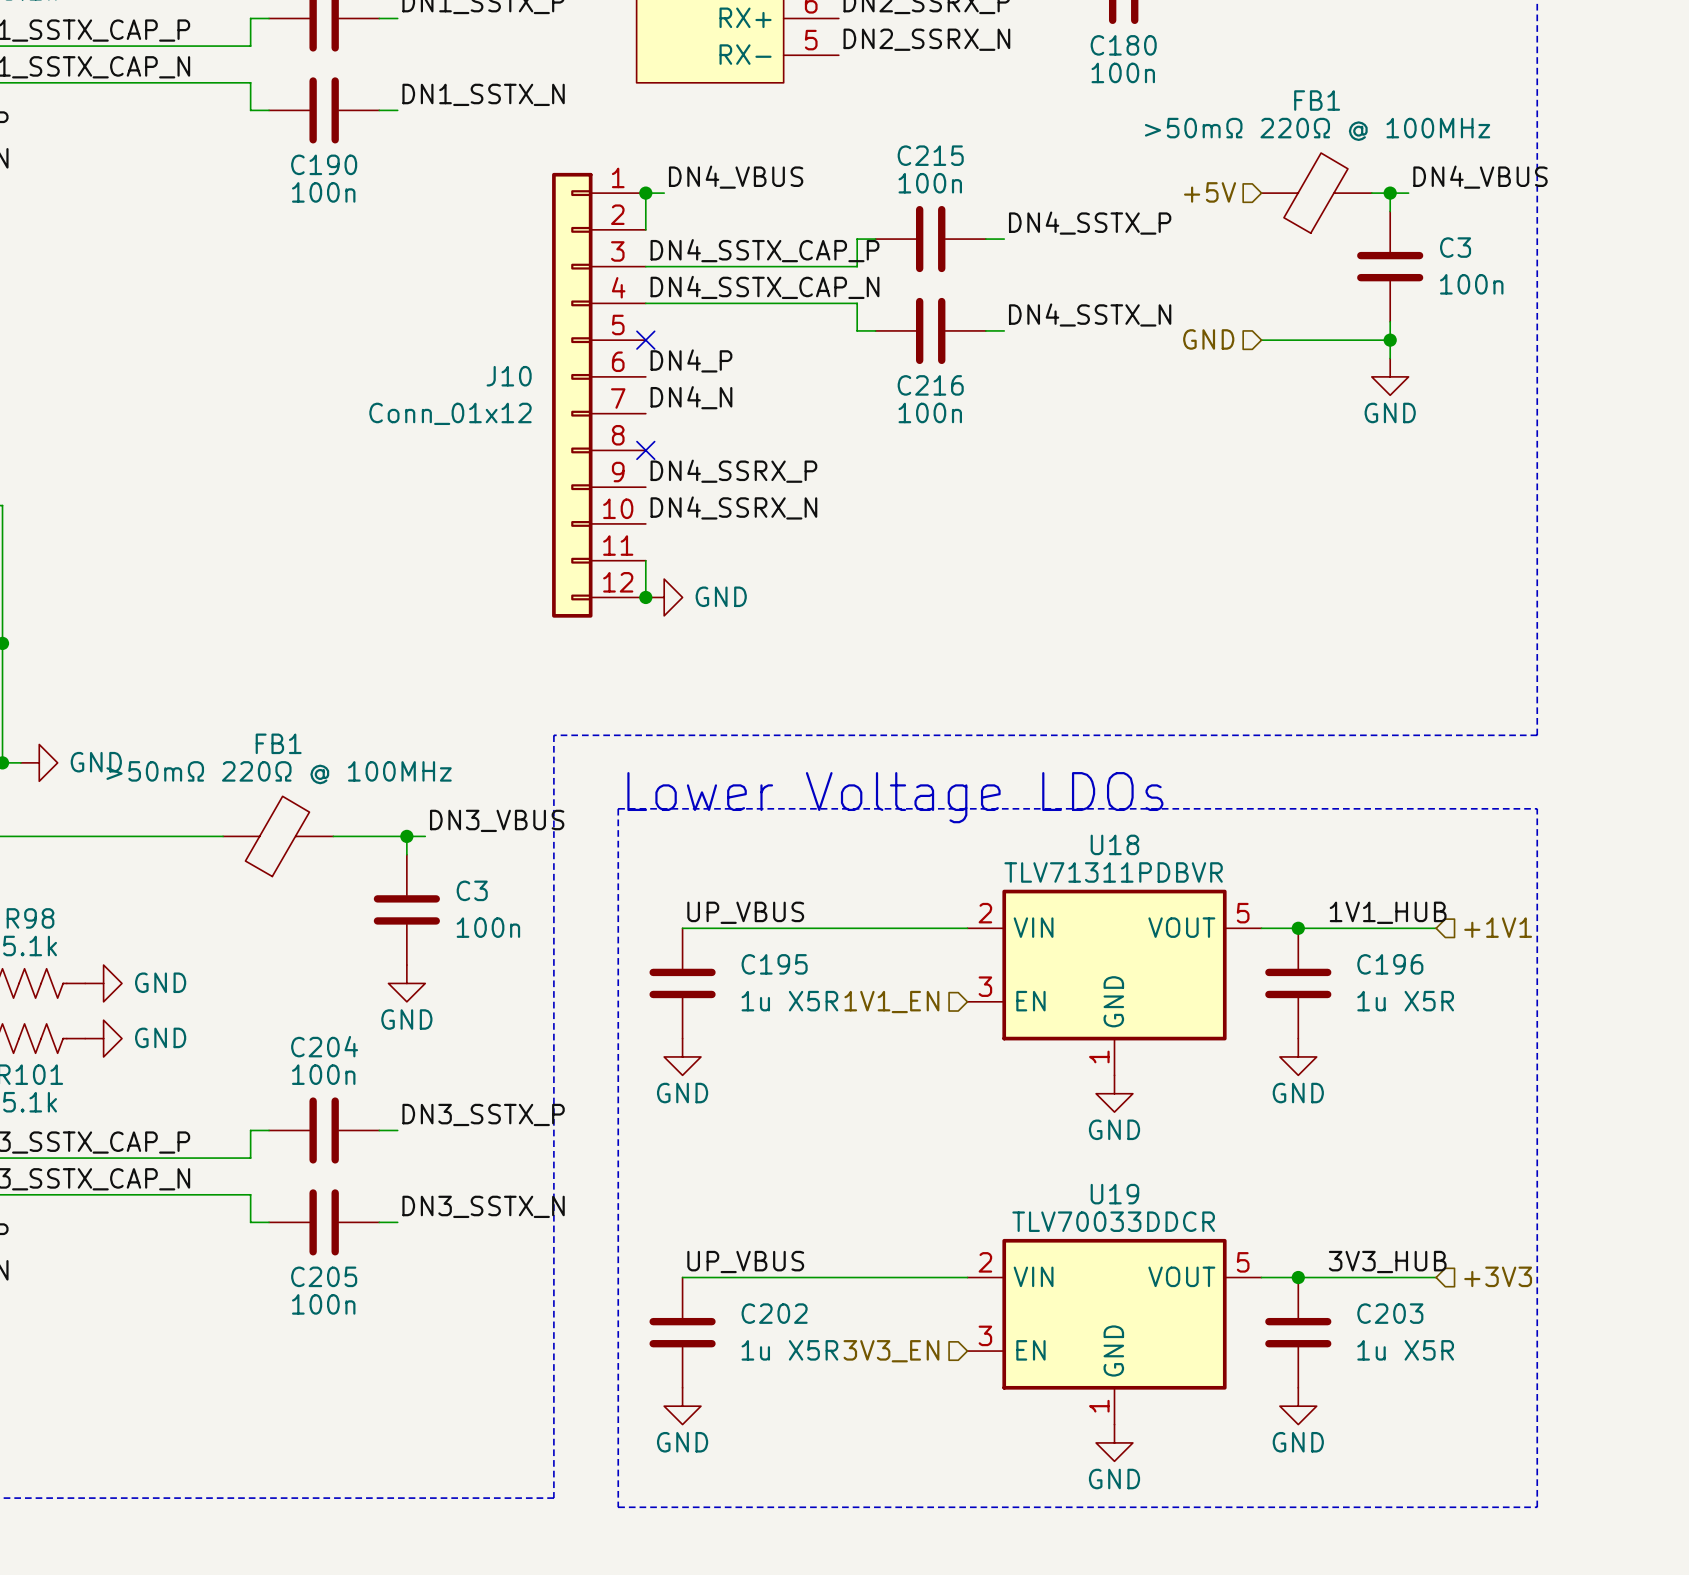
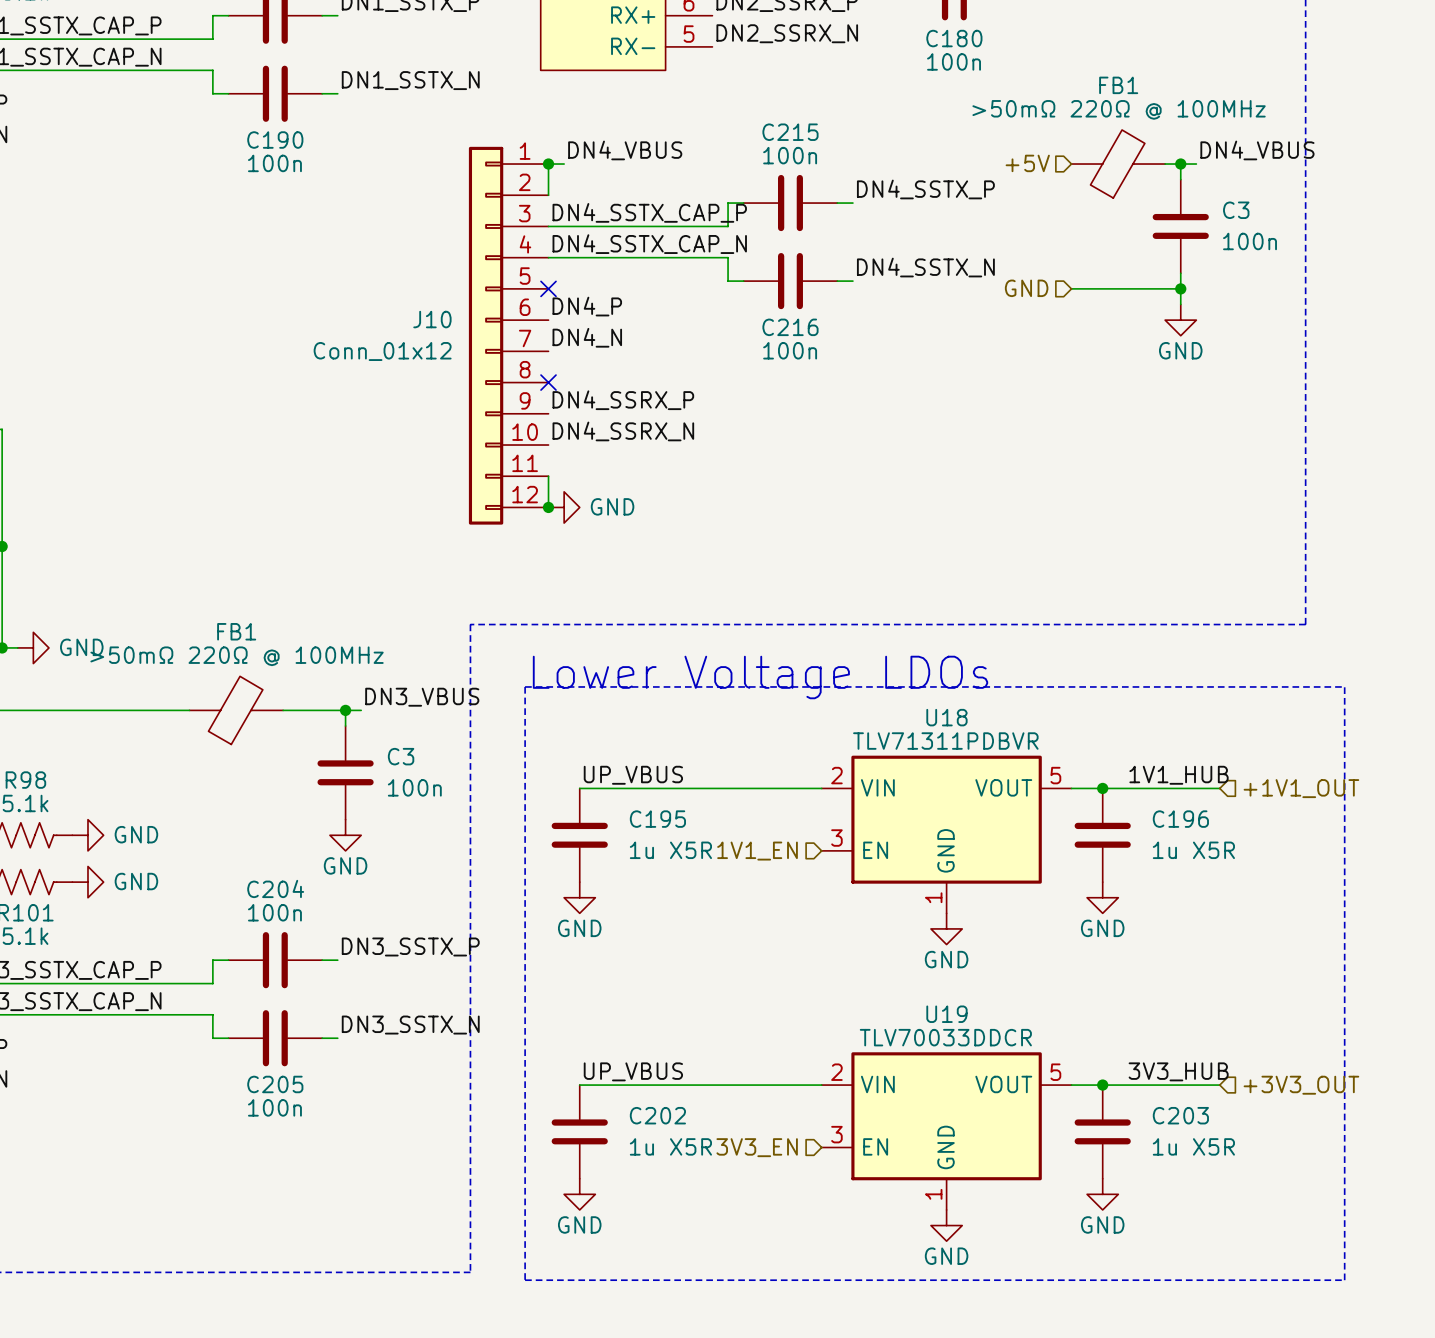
line: (1537, 808) (1537, 1507) -> (1305, 686) (1344, 686) (1344, 1280) (1305, 1280)
hierarchical label: +1V1 (1498, 927) -> +1V1_OUT (1301, 788)
hierarchical label: +3V3 (1498, 1276) -> +3V3_OUT (1301, 1085)

